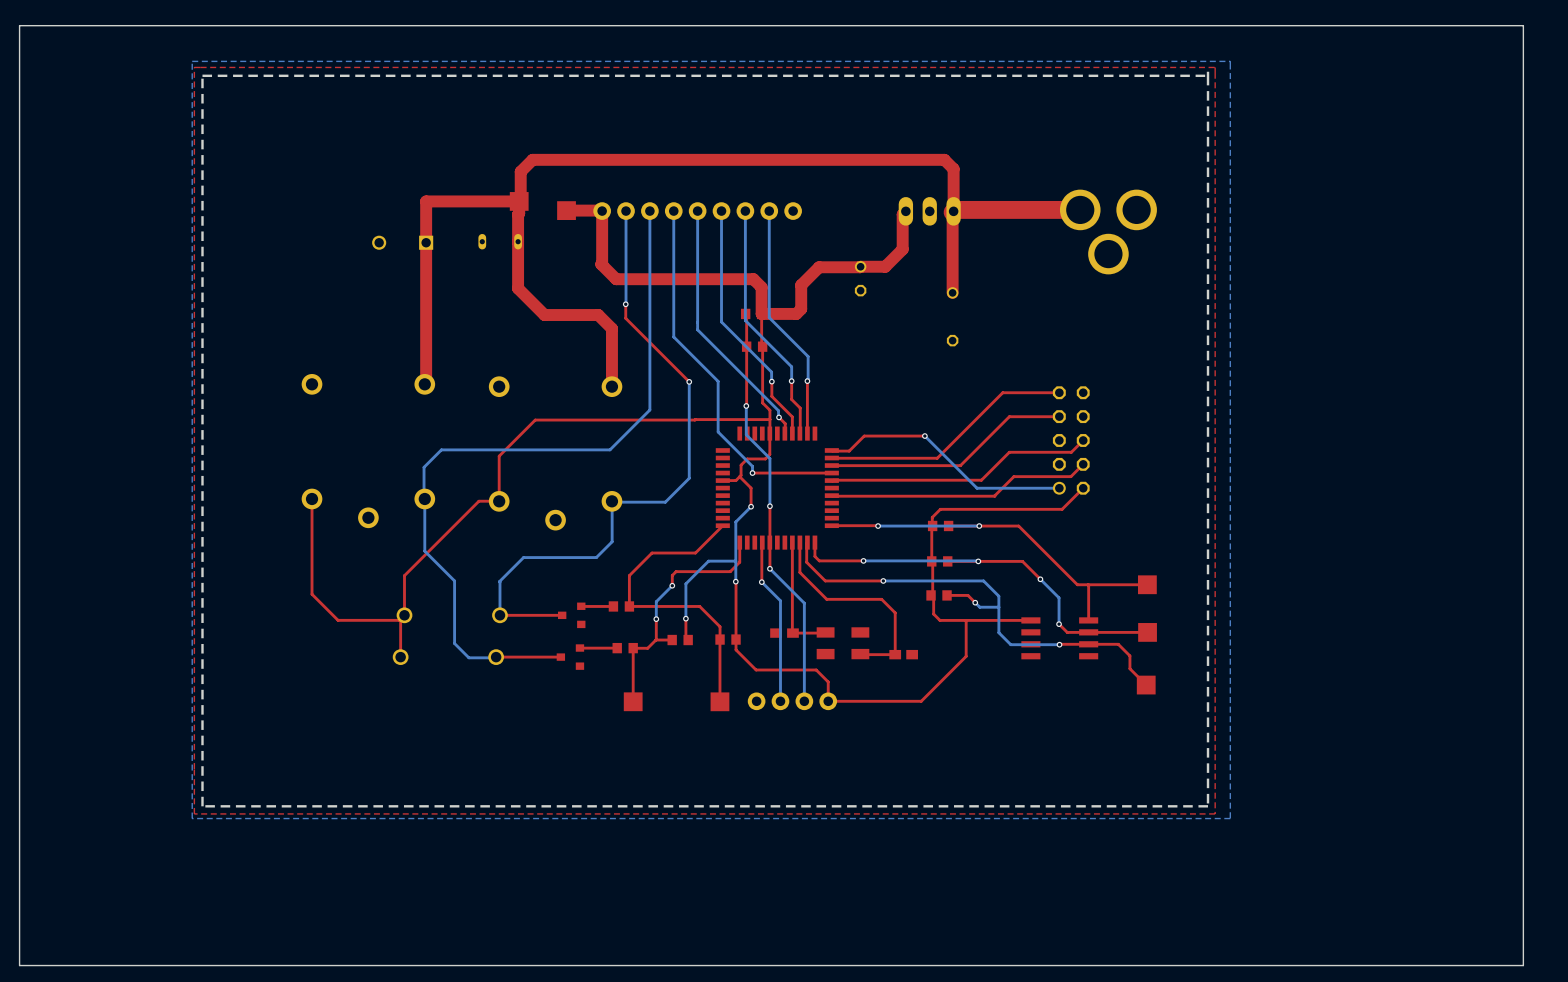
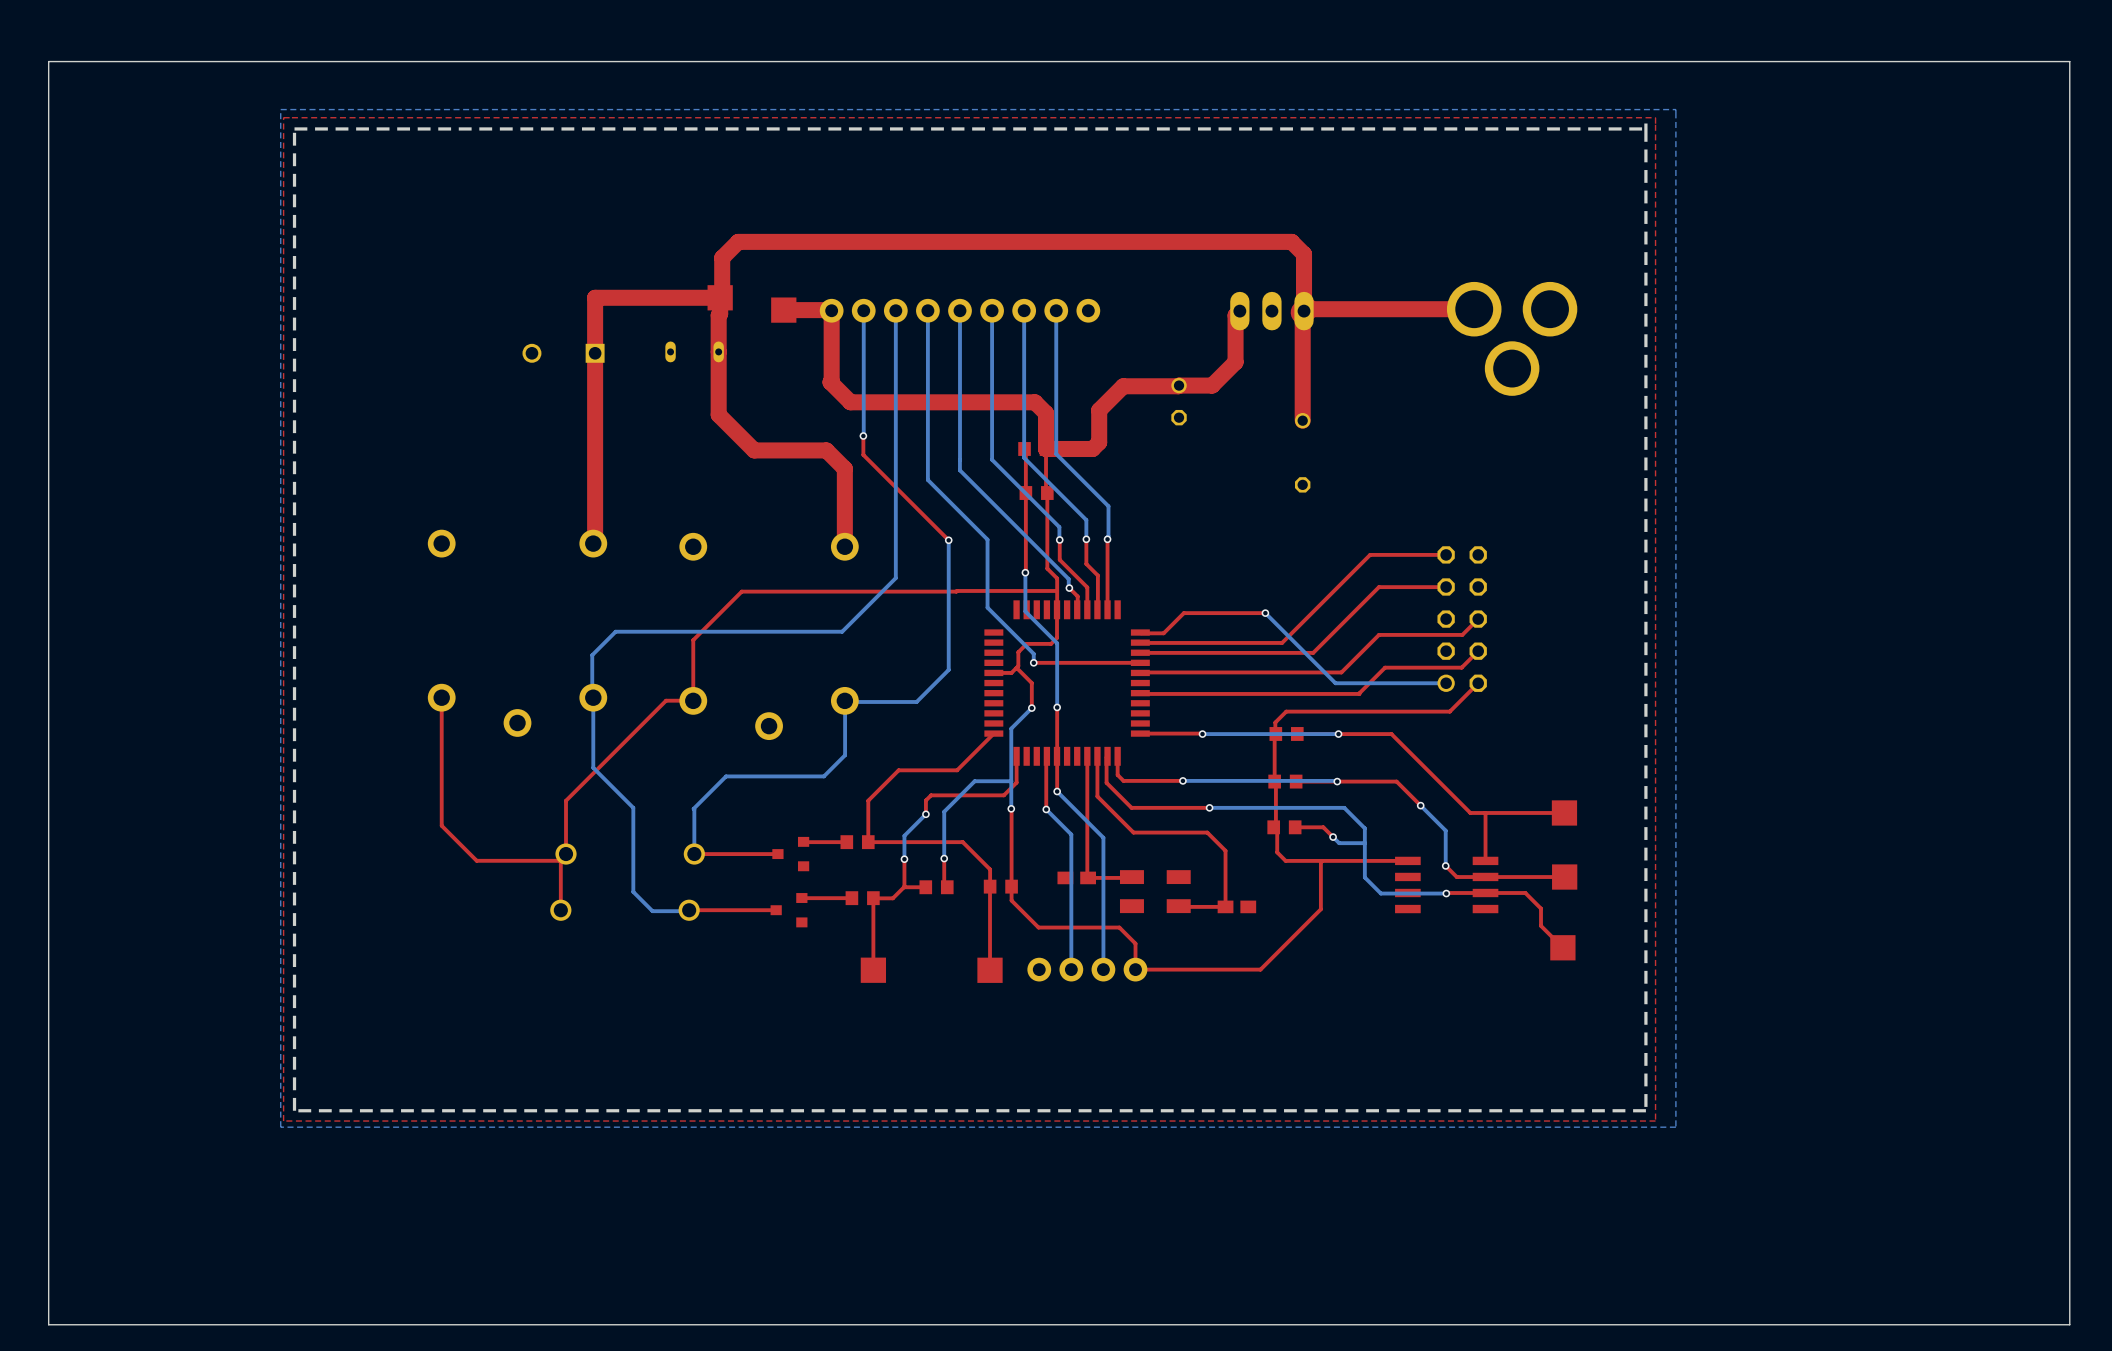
top track width: thick (1080, 209) (955, 209) -> thin (1474, 309) (1305, 309)

